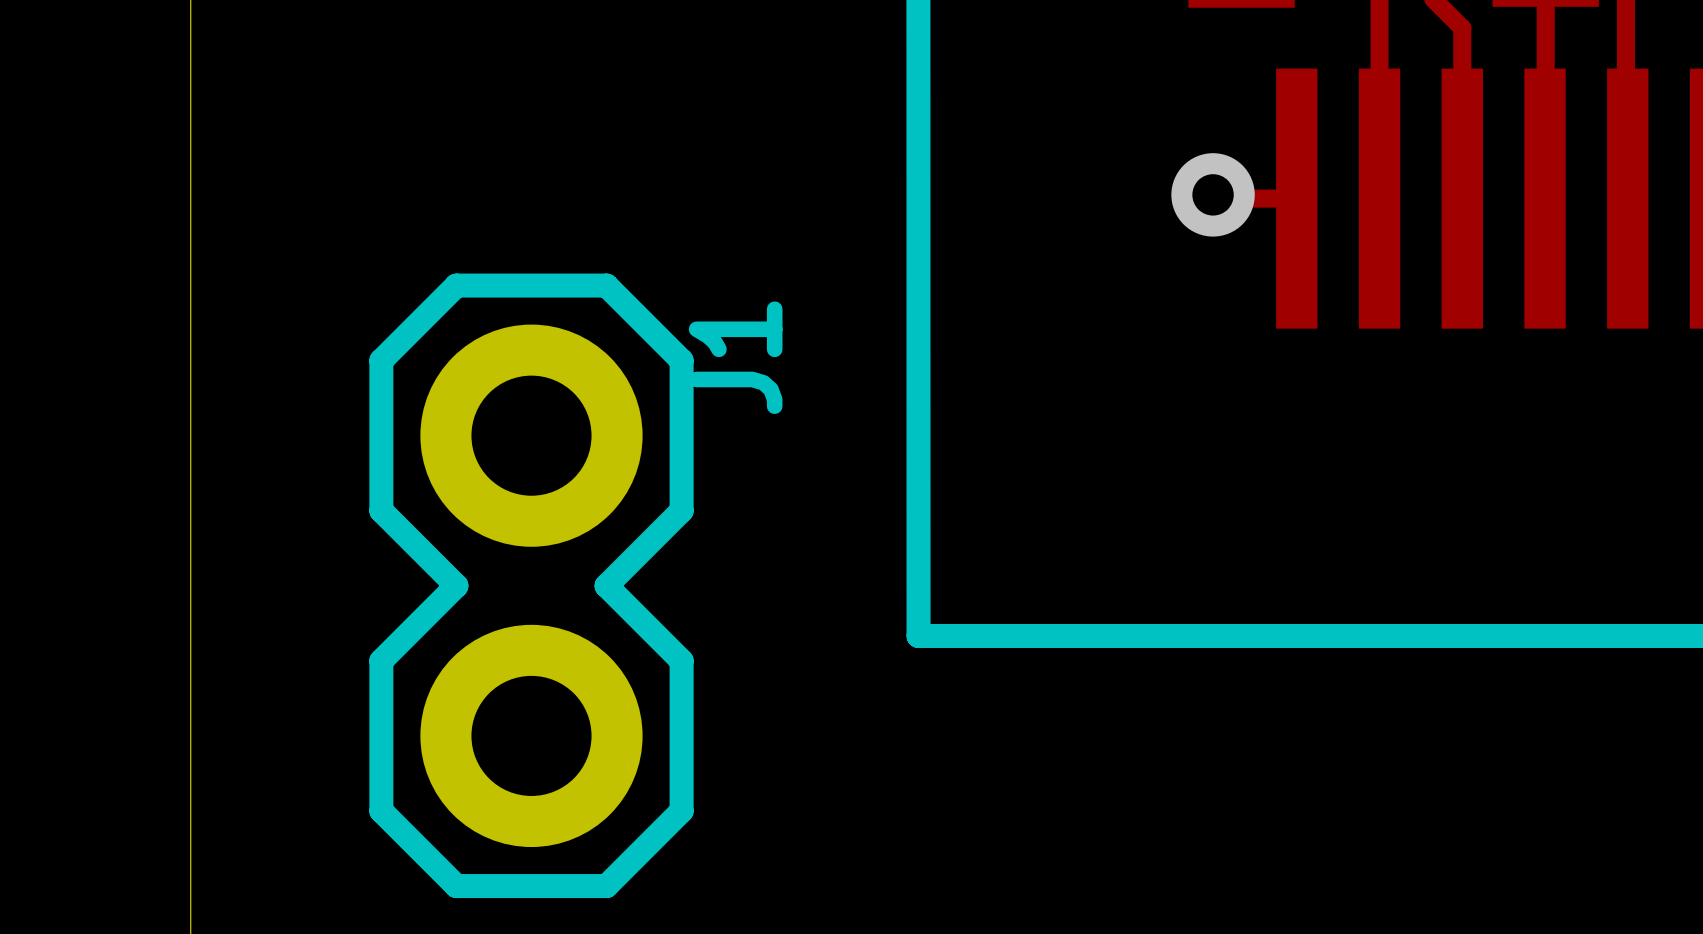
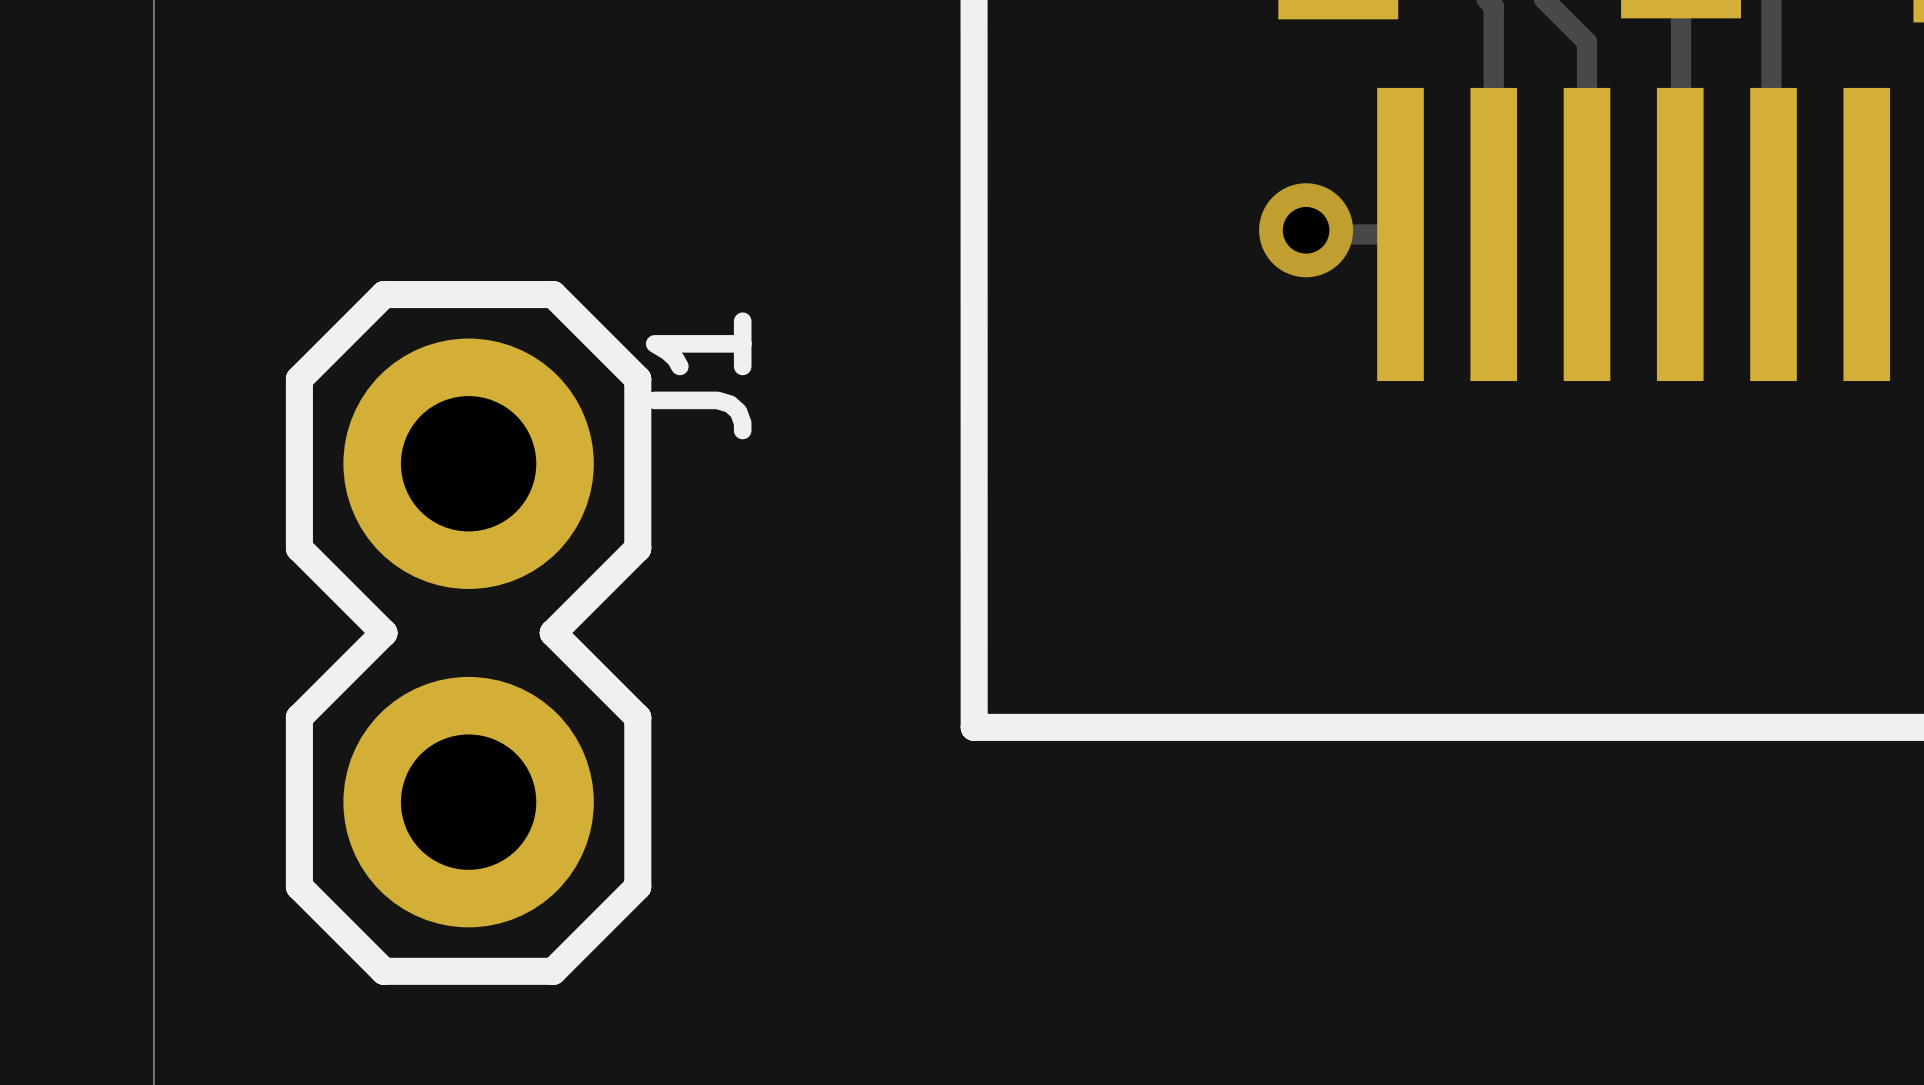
J1 position: (531, 585) -> (468, 632)

